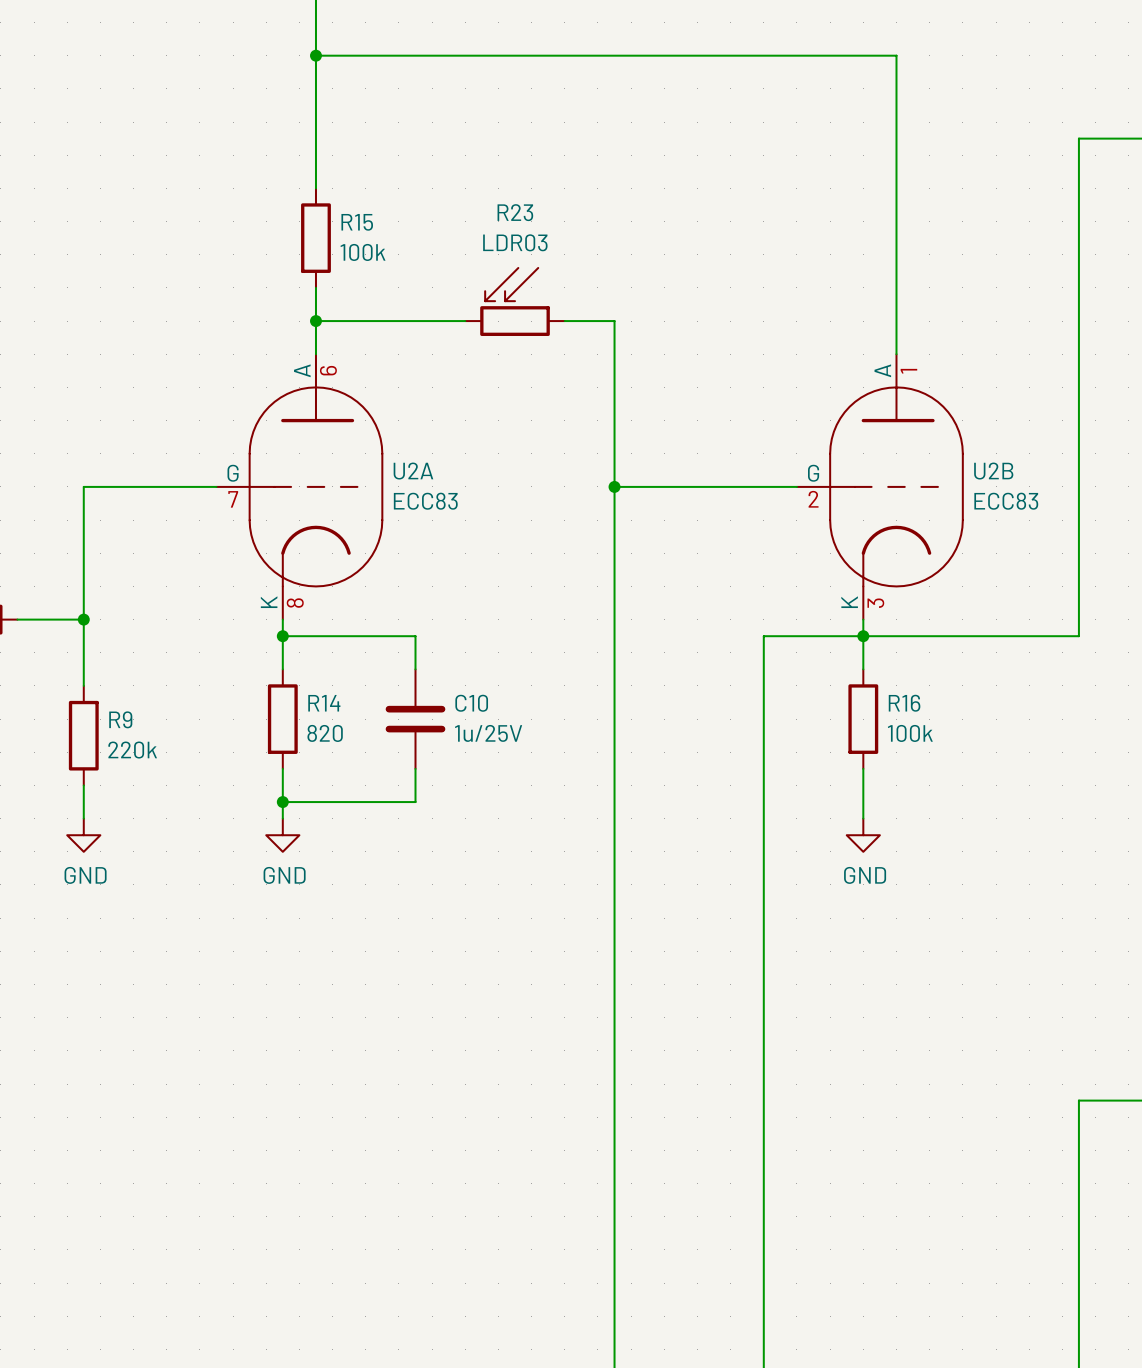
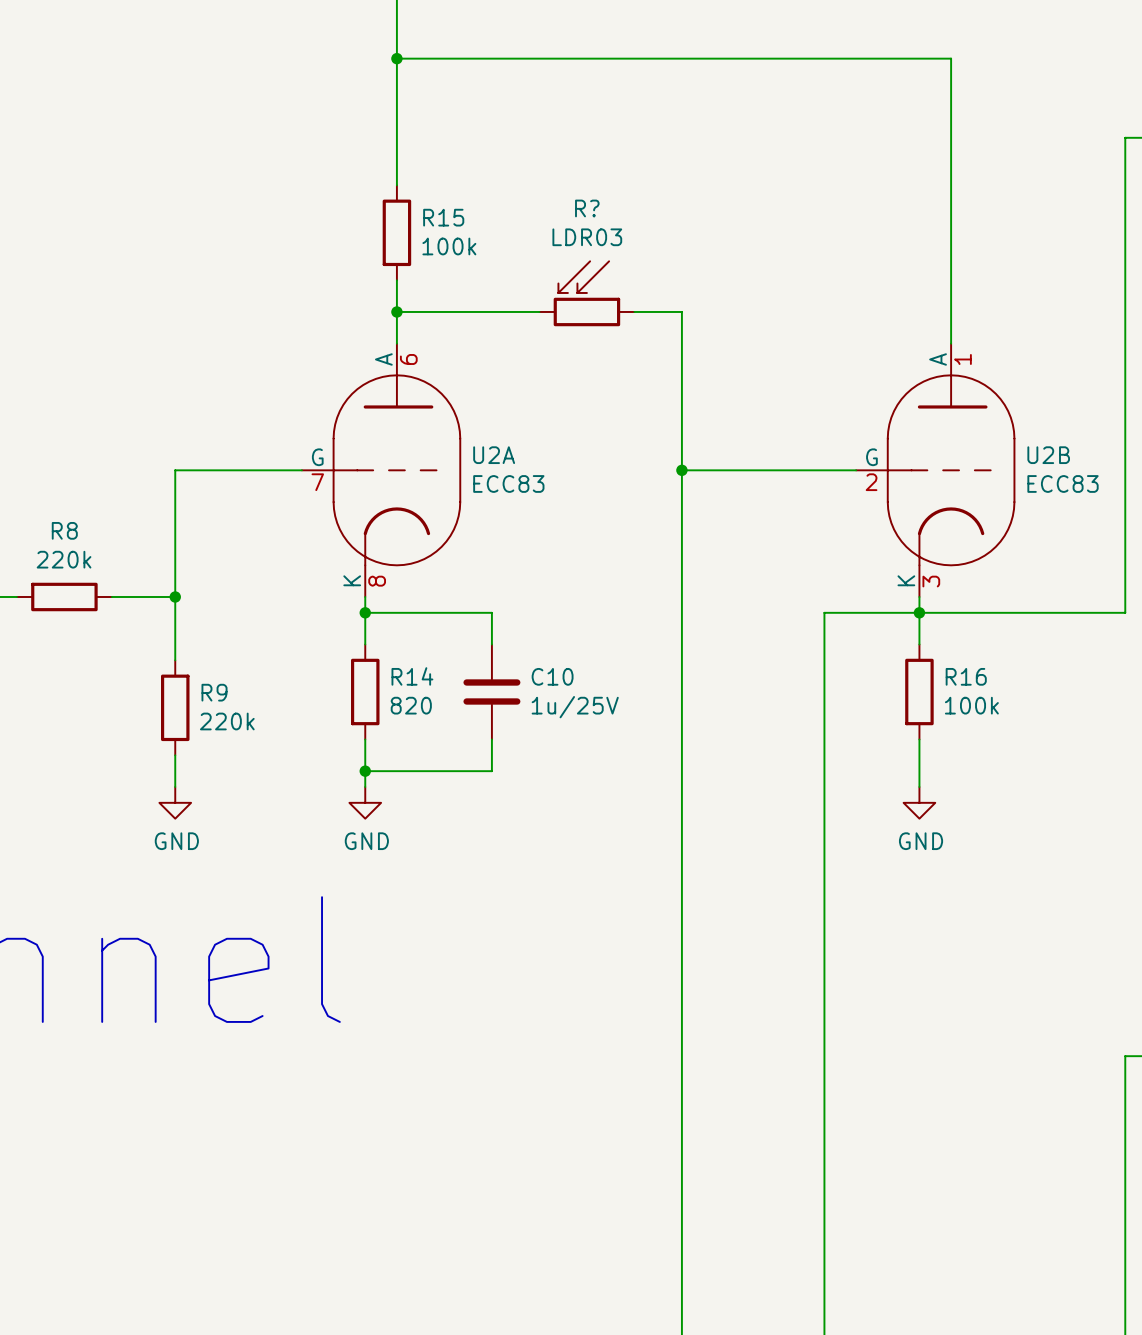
R23 name: R23 (515, 212) -> R? (587, 208)

